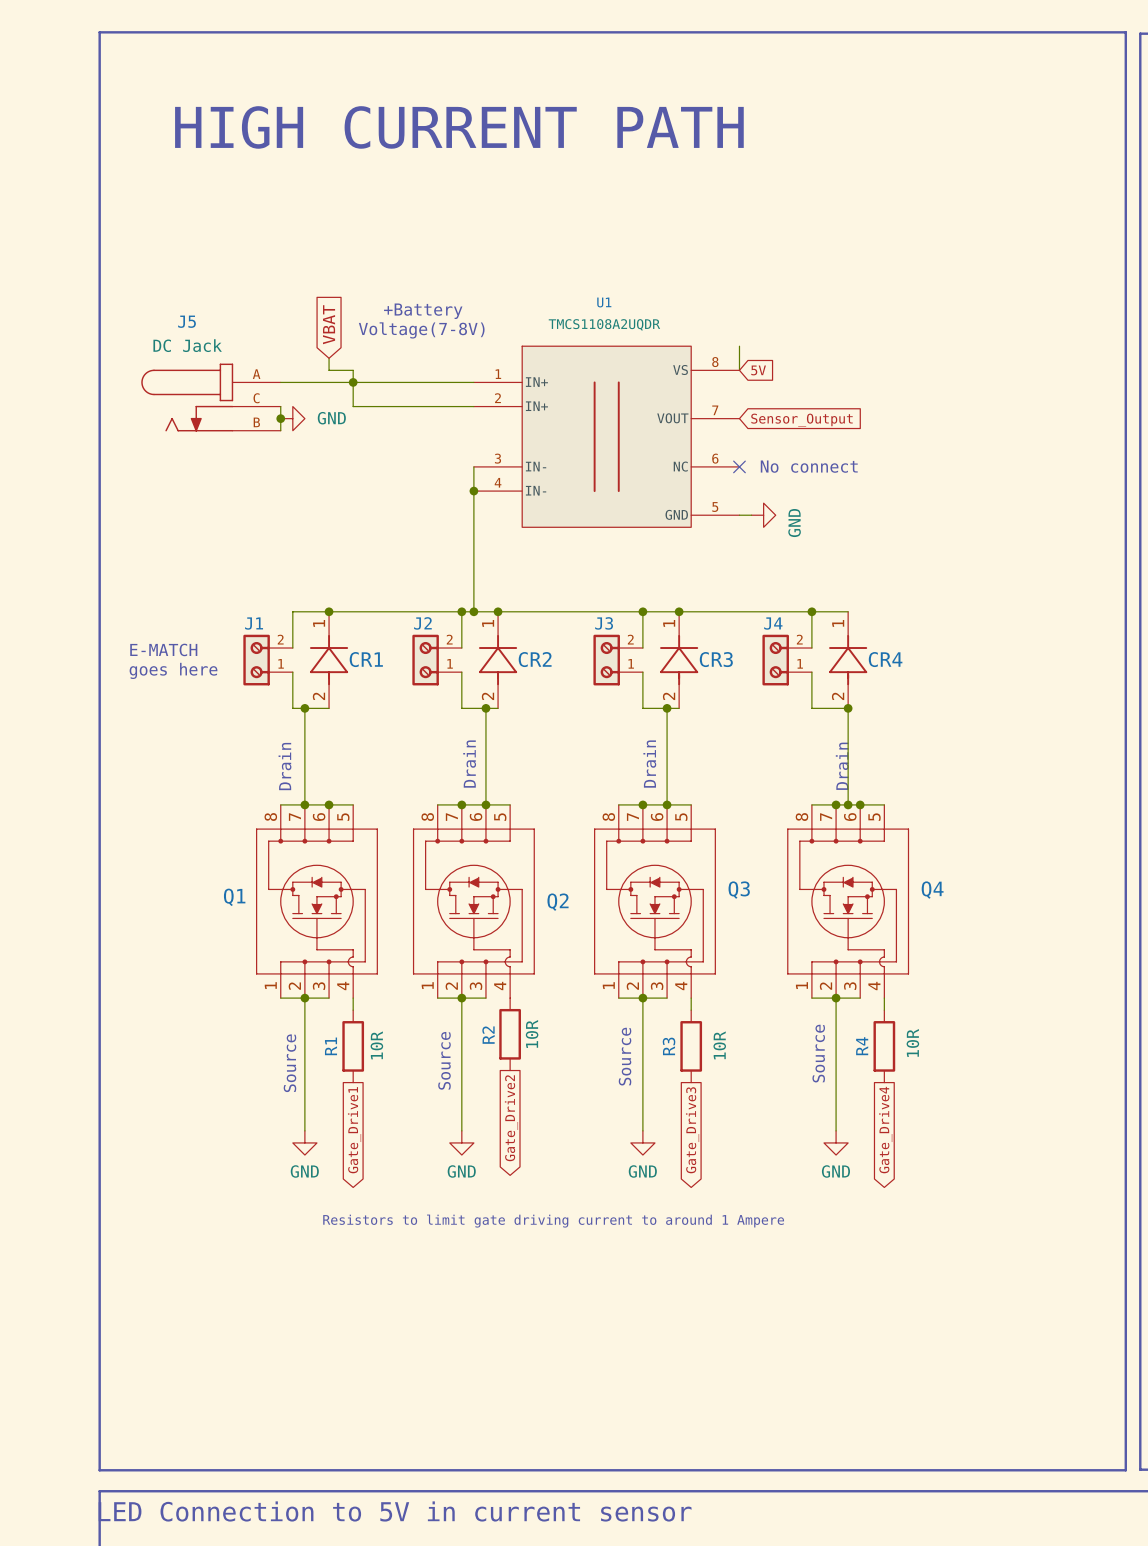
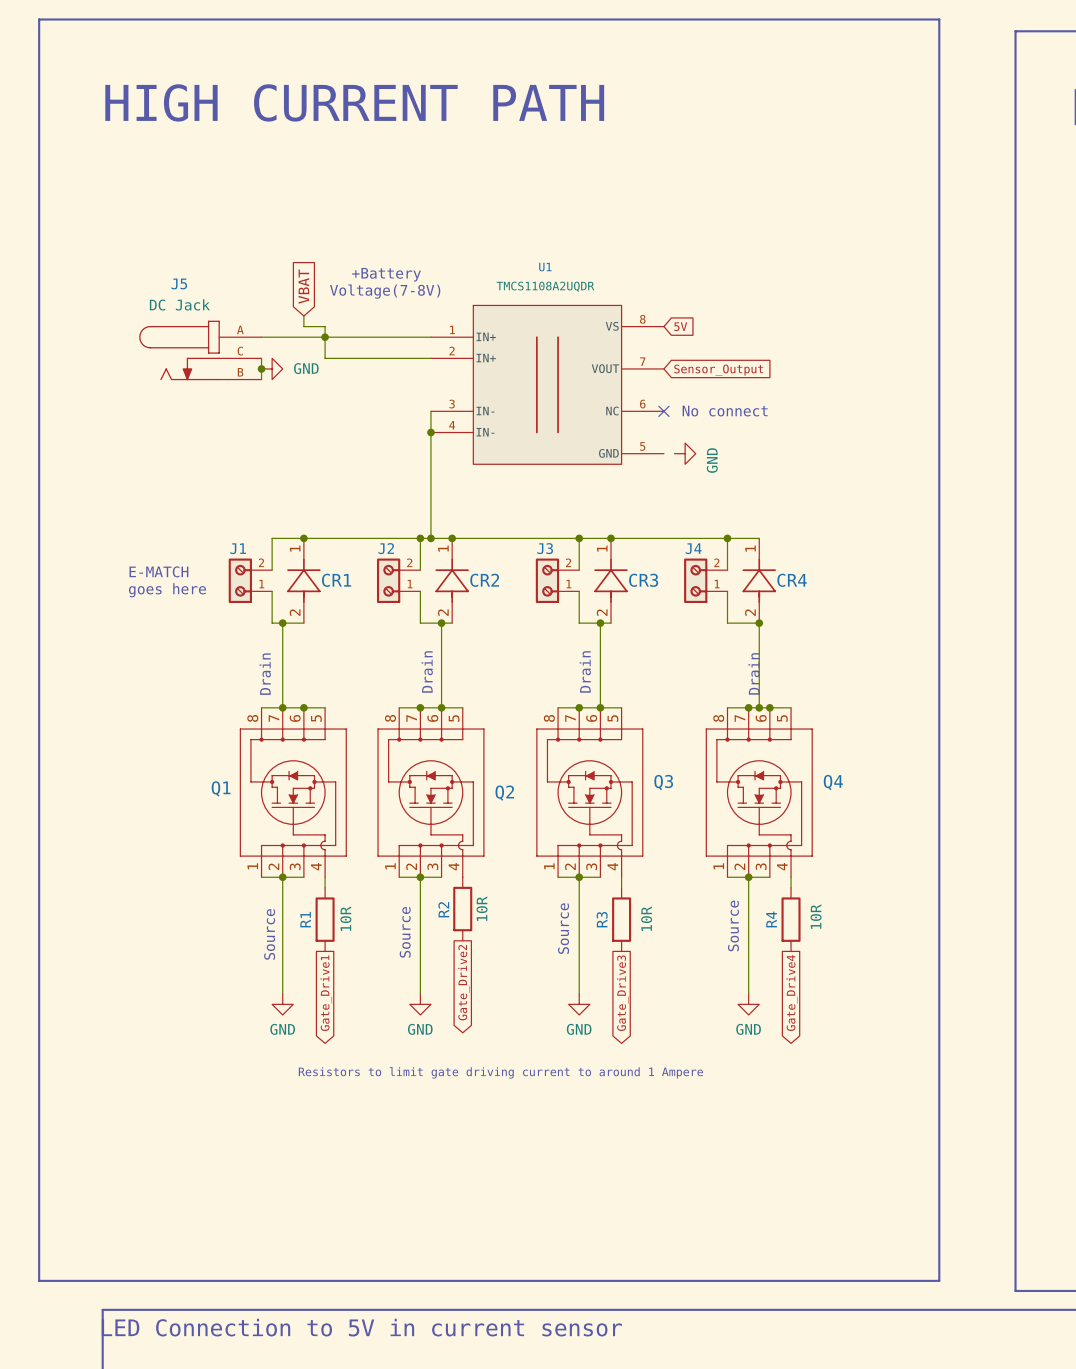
line: (99, 32) (1125, 32) (1125, 1470) (99, 1470) (99, 32) -> (39, 19) (939, 19) (939, 1280) (39, 1280) (39, 19)
text position: HIGH CURRENT PATH (459, 127) -> HIGH CURRENT PATH (354, 102)
wire: (739, 346) (739, 370) -> none
wire: (739, 515) (751, 515) -> none

